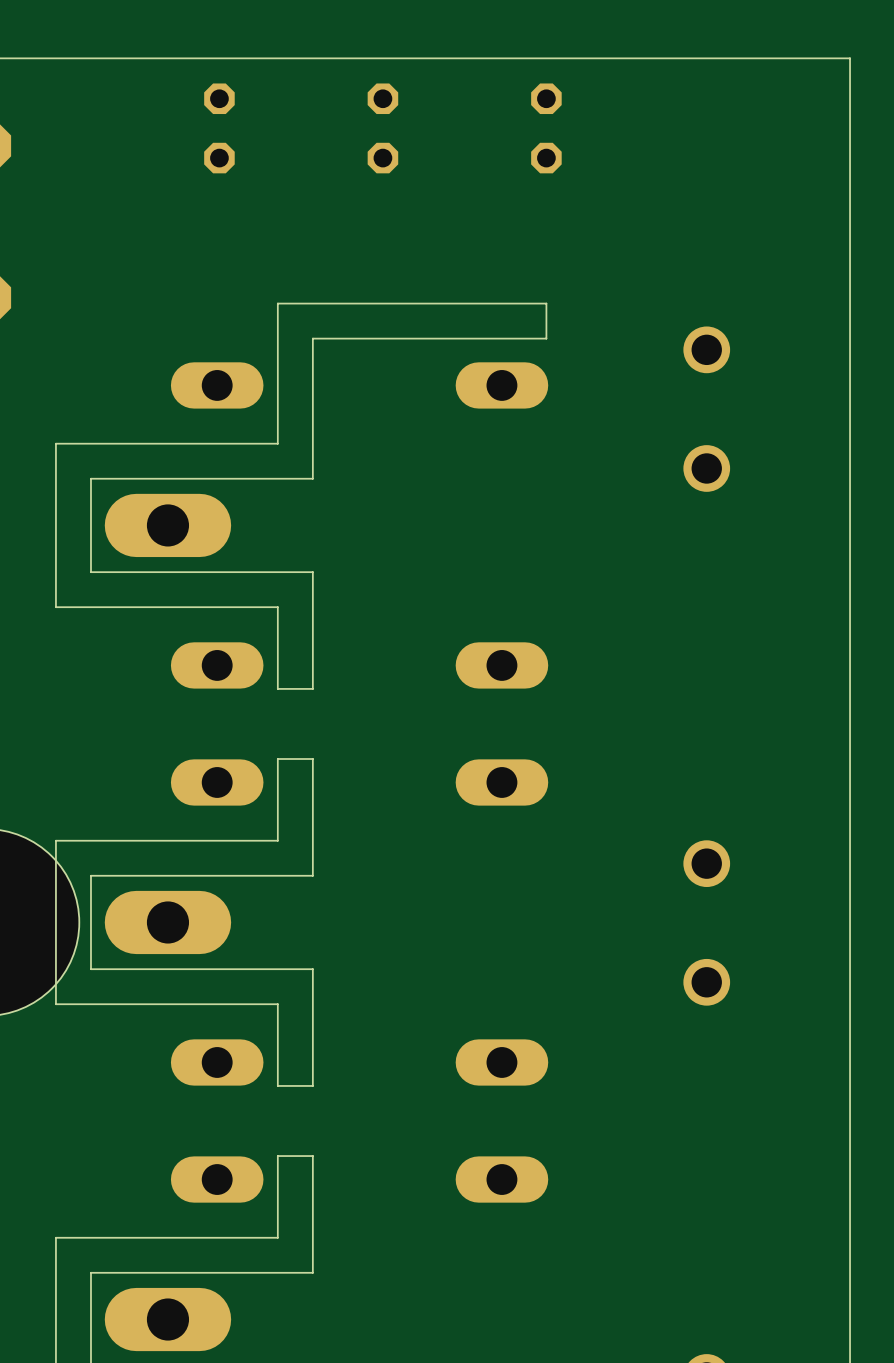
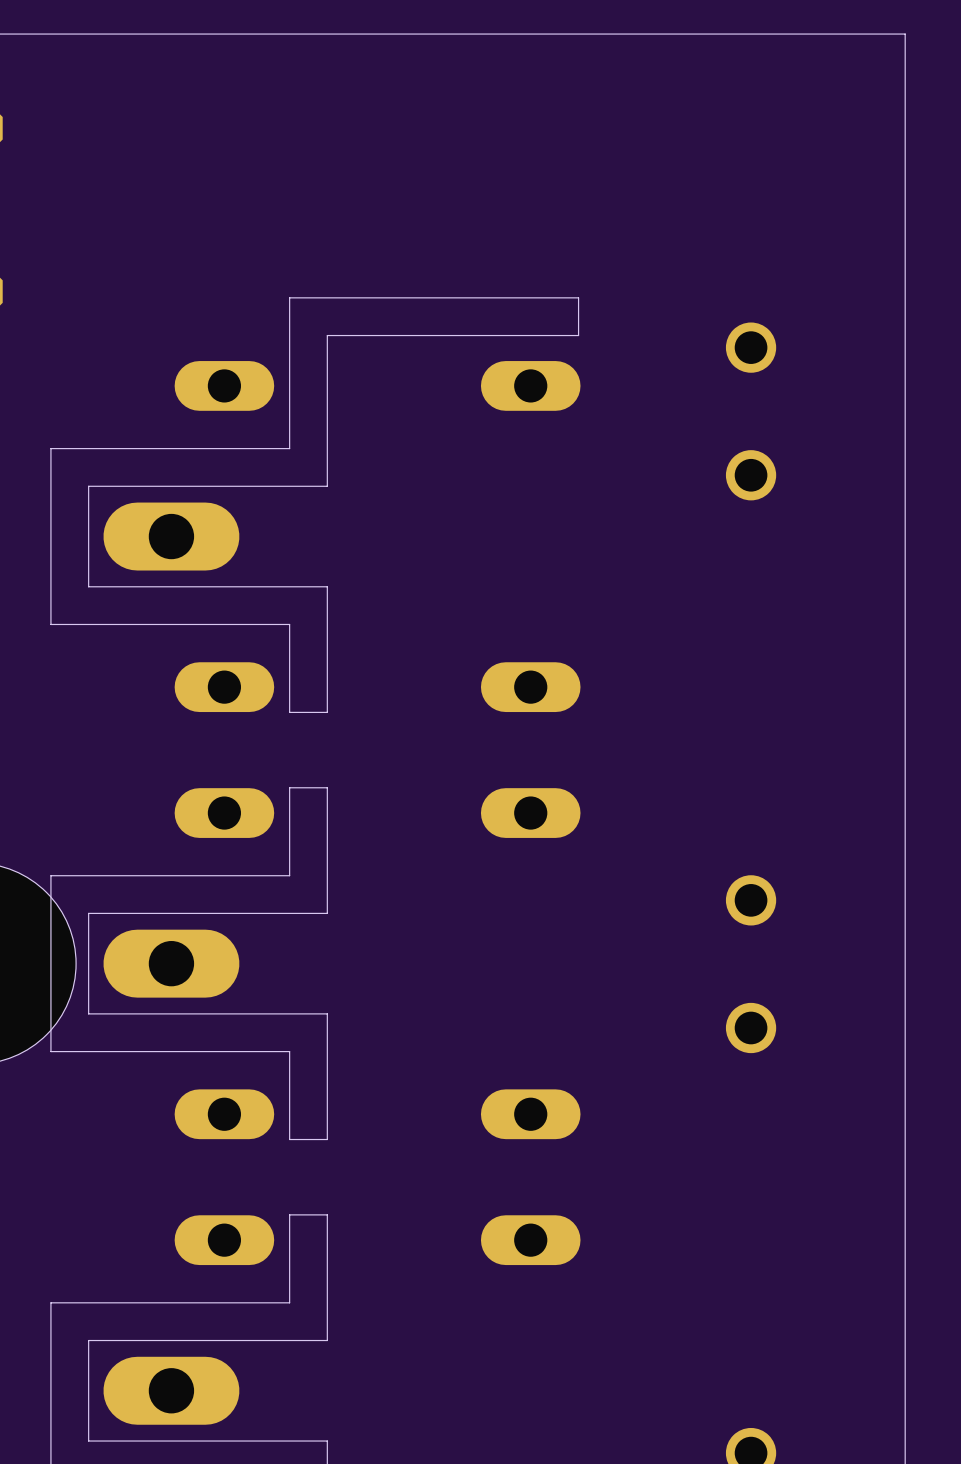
part: (219, 128) -> none
part: (382, 128) -> none
part: (546, 128) -> none

